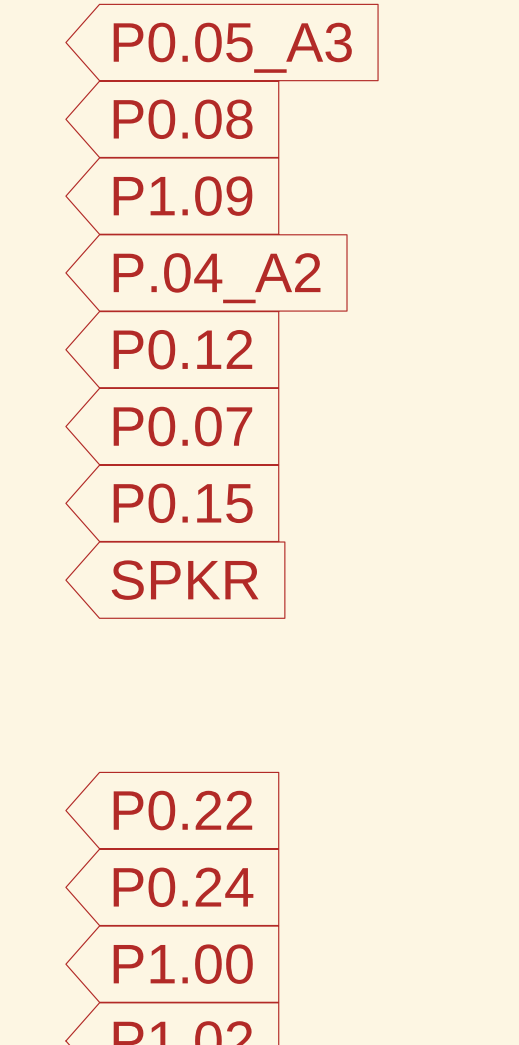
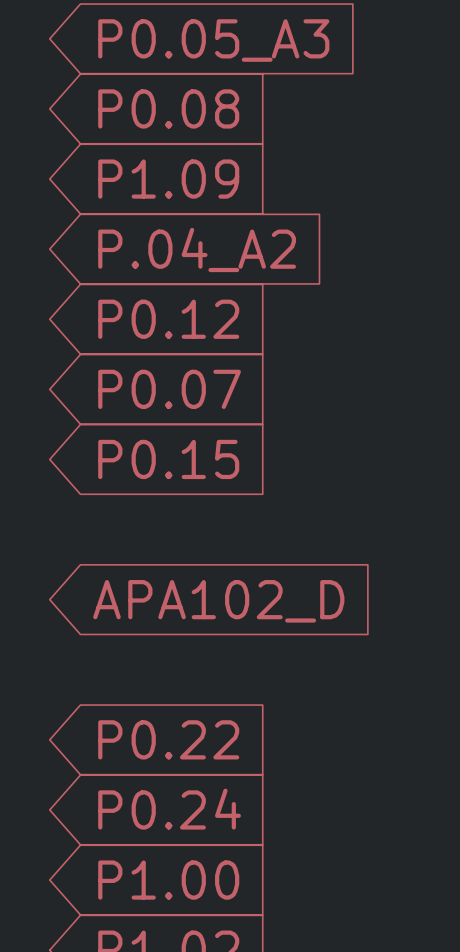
global label: SPKR (185, 580) -> none
global label: none -> APA102_D (218, 601)

